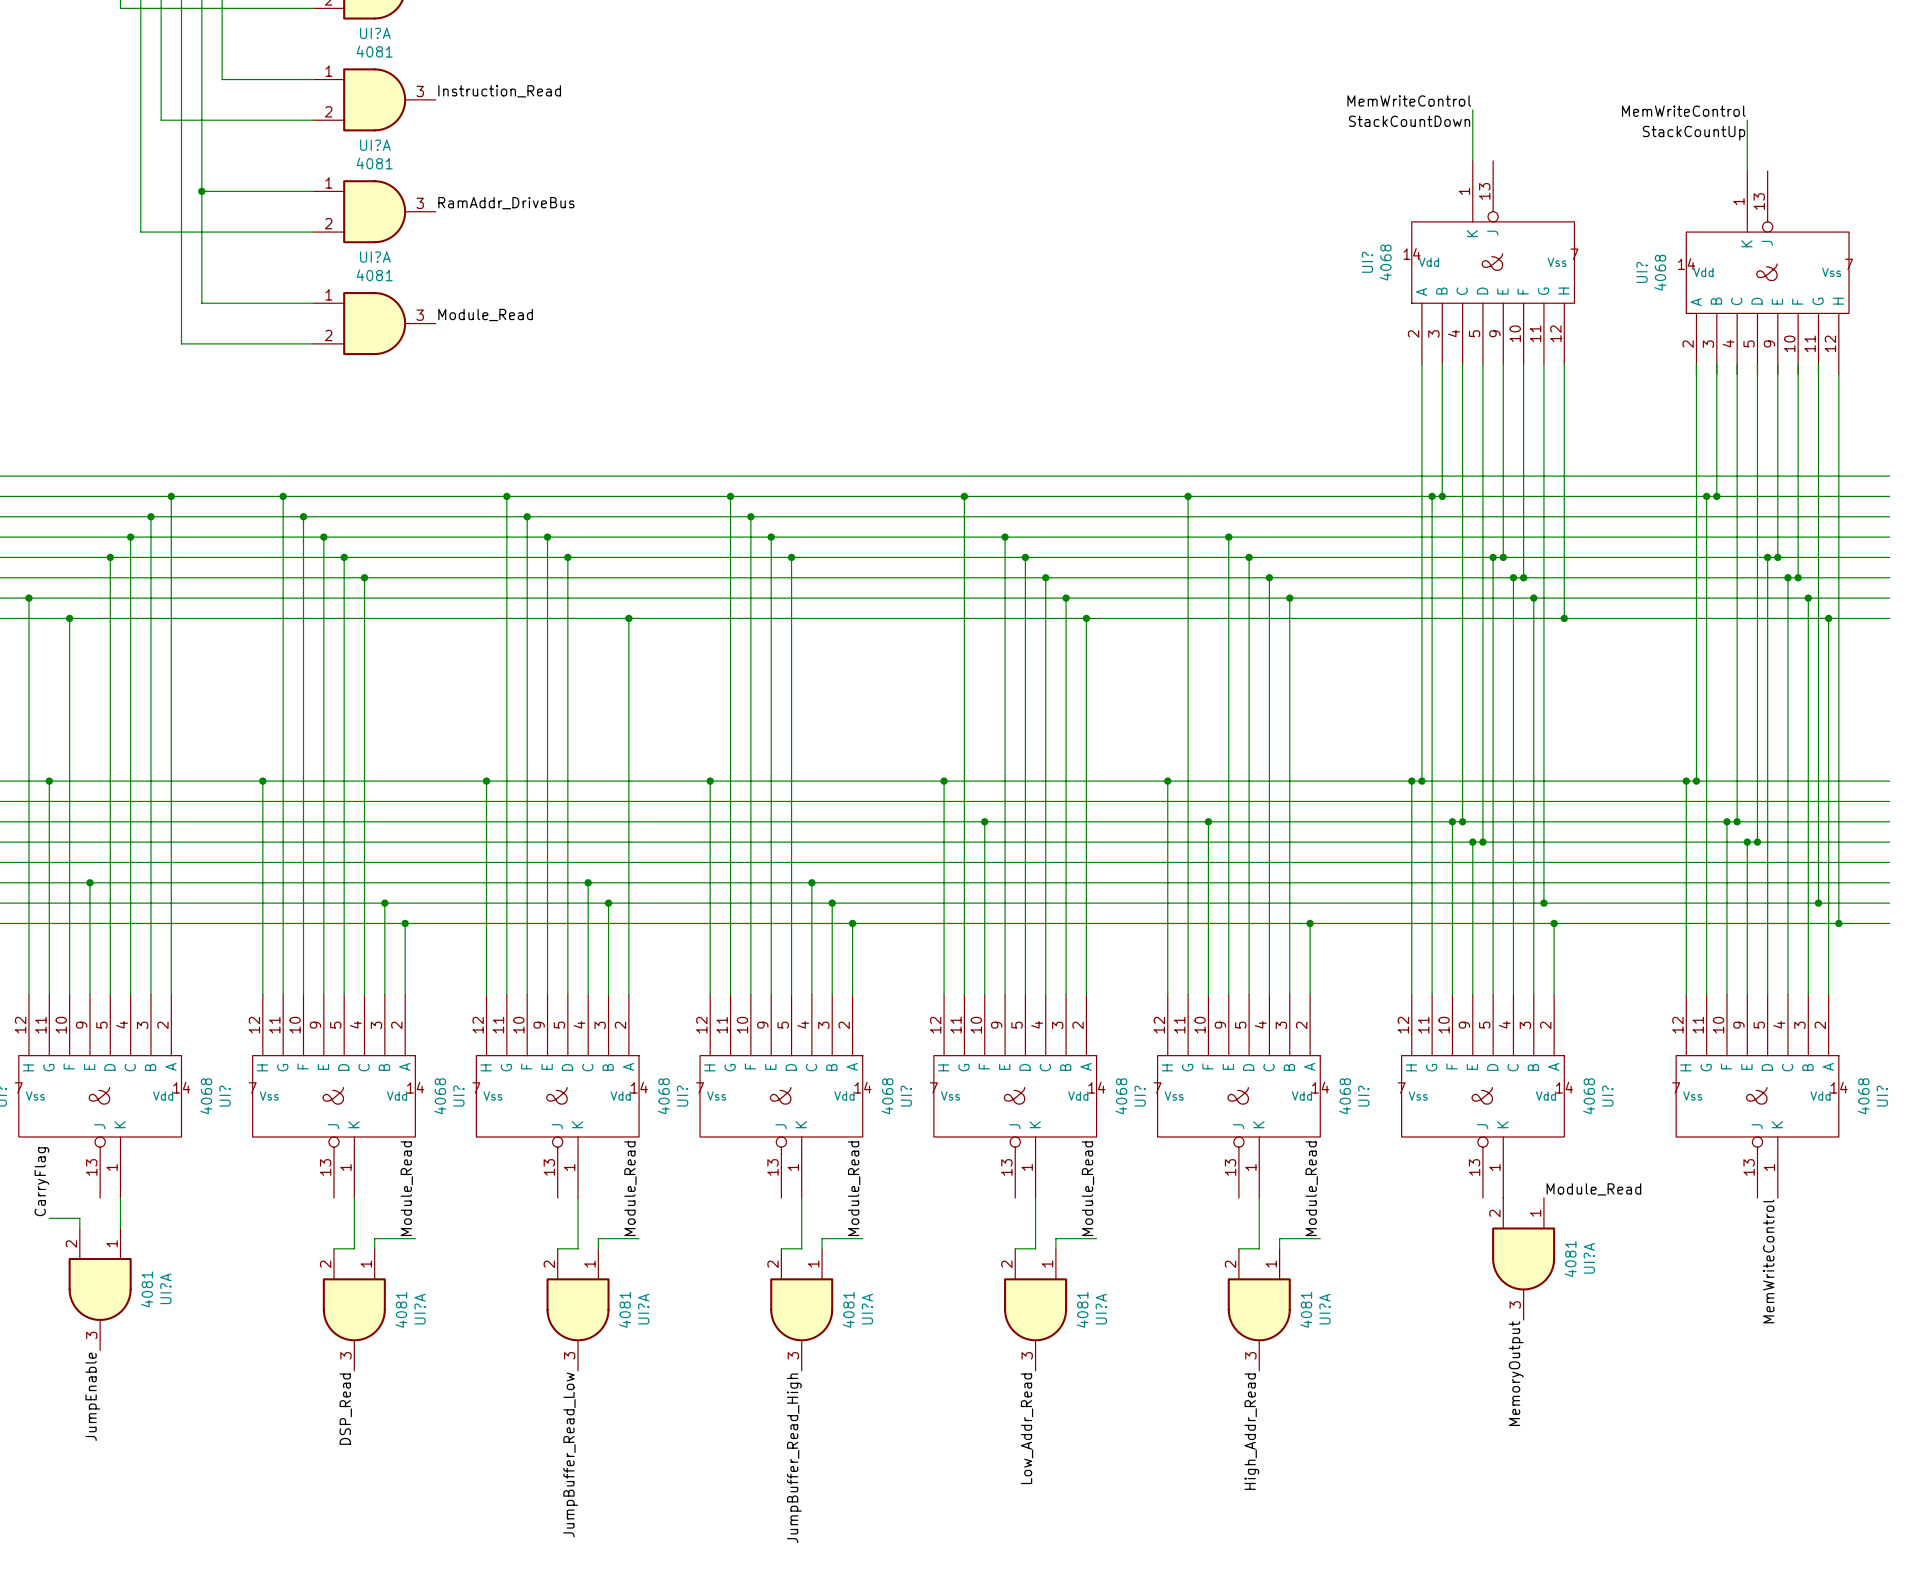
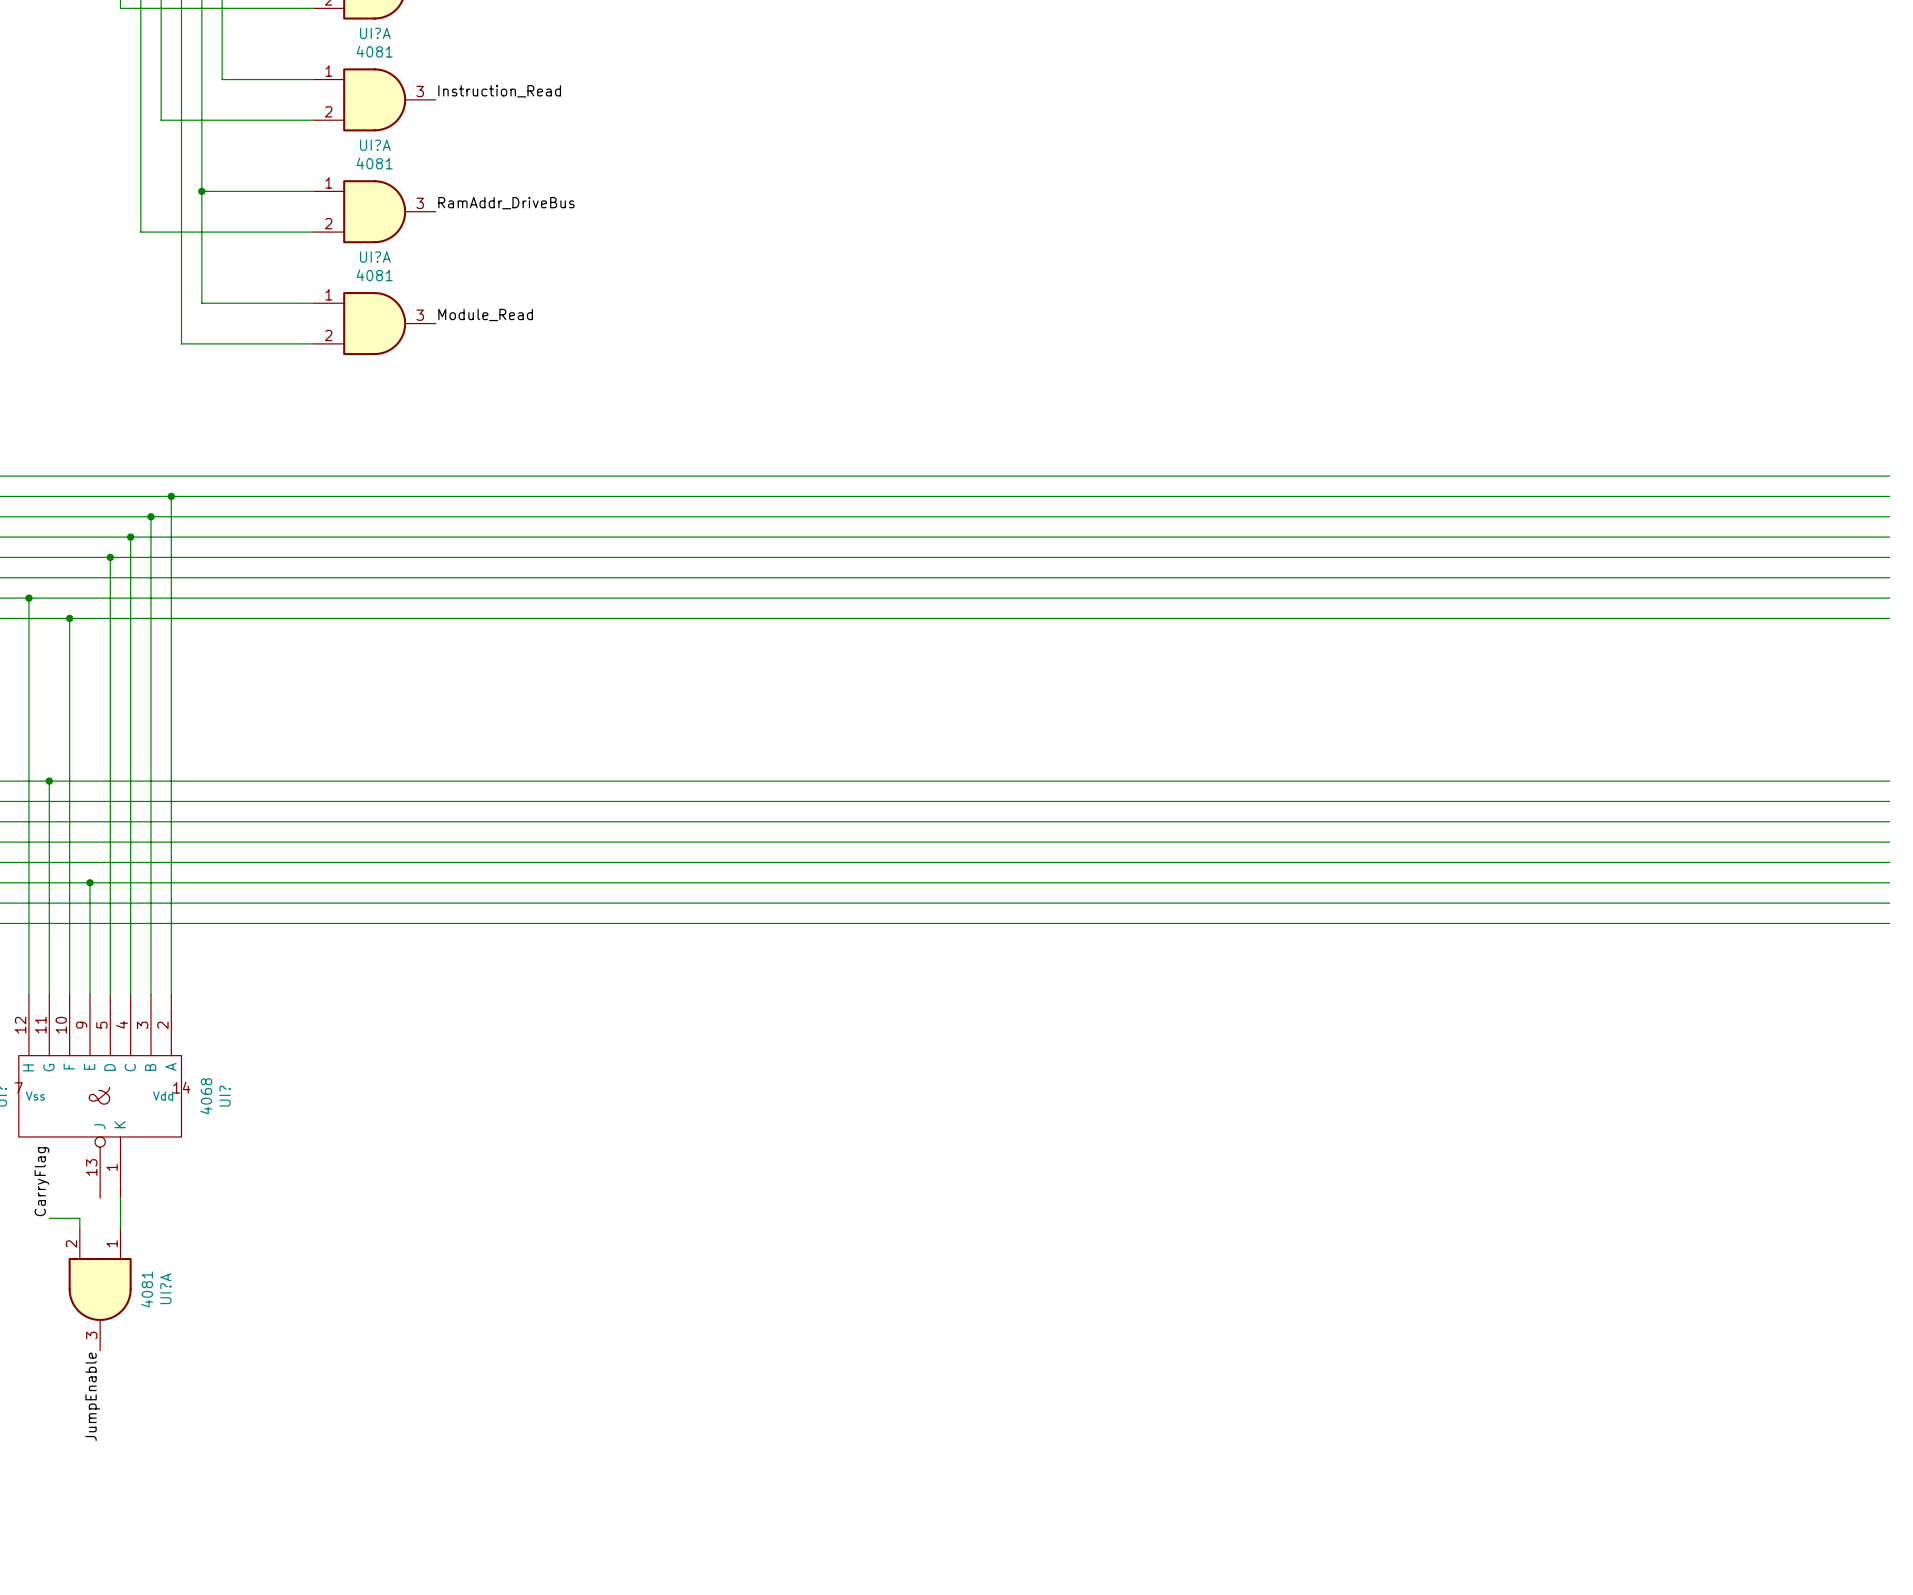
label: MemWriteControl (1409, 100) -> none
wire: (1472, 110) (1472, 160) -> none
label: MemWriteControl (1683, 111) -> none
wire: (1747, 120) (1747, 171) -> none
label: StackCountDown (1409, 121) -> none
label: StackCountUp (1693, 133) -> none
UI?: 4068 (1493, 262) -> none
UI?: 4068 (1767, 272) -> none
wire: (1421, 364) (1421, 781) -> none
wire: (1442, 364) (1442, 496) -> none
wire: (1462, 364) (1462, 821) -> none
wire: (1482, 364) (1482, 842) -> none
wire: (1503, 364) (1503, 557) -> none
wire: (1523, 364) (1523, 577) -> none
wire: (1543, 364) (1543, 903) -> none
wire: (1564, 364) (1564, 618) -> none
wire: (1696, 364) (1696, 781) -> none
wire: (1716, 364) (1716, 496) -> none
wire: (1737, 364) (1737, 821) -> none
wire: (1757, 364) (1757, 842) -> none
wire: (1777, 364) (1777, 557) -> none
wire: (1798, 364) (1798, 577) -> none
wire: (1818, 364) (1818, 903) -> none
wire: (1838, 374) (1838, 923) -> none
wire: (283, 496) (283, 994) -> none
junction: (283, 496) -> none
wire: (506, 496) (506, 994) -> none
junction: (506, 496) -> none
wire: (730, 496) (730, 994) -> none
junction: (730, 496) -> none
wire: (964, 496) (964, 994) -> none
junction: (964, 496) -> none
wire: (1188, 496) (1188, 994) -> none
junction: (1188, 496) -> none
wire: (1432, 496) (1432, 994) -> none
junction: (1432, 496) -> none
junction: (1442, 496) -> none
wire: (1706, 496) (1706, 994) -> none
junction: (1706, 496) -> none
junction: (1716, 496) -> none
wire: (303, 516) (303, 994) -> none
junction: (303, 516) -> none
wire: (527, 516) (527, 994) -> none
junction: (527, 516) -> none
wire: (750, 516) (750, 994) -> none
junction: (750, 516) -> none
wire: (323, 537) (323, 994) -> none
junction: (323, 537) -> none
wire: (547, 537) (547, 994) -> none
junction: (547, 537) -> none
wire: (771, 537) (771, 994) -> none
junction: (771, 537) -> none
wire: (1005, 537) (1005, 994) -> none
junction: (1005, 537) -> none
wire: (1228, 537) (1228, 994) -> none
junction: (1228, 537) -> none
wire: (344, 557) (344, 994) -> none
junction: (344, 557) -> none
wire: (567, 557) (567, 994) -> none
junction: (567, 557) -> none
wire: (791, 557) (791, 994) -> none
junction: (791, 557) -> none
wire: (1025, 557) (1025, 994) -> none
junction: (1025, 557) -> none
wire: (1249, 557) (1249, 994) -> none
junction: (1249, 557) -> none
wire: (1493, 557) (1493, 994) -> none
junction: (1493, 557) -> none
junction: (1503, 557) -> none
wire: (1767, 557) (1767, 994) -> none
junction: (1767, 557) -> none
junction: (1777, 557) -> none
wire: (364, 577) (364, 994) -> none
junction: (364, 577) -> none
wire: (1045, 577) (1045, 994) -> none
junction: (1045, 577) -> none
wire: (1269, 577) (1269, 994) -> none
junction: (1269, 577) -> none
wire: (1513, 577) (1513, 994) -> none
junction: (1513, 577) -> none
junction: (1523, 577) -> none
wire: (1787, 577) (1787, 994) -> none
junction: (1787, 577) -> none
junction: (1798, 577) -> none
wire: (1066, 598) (1066, 994) -> none
junction: (1066, 598) -> none
wire: (1289, 598) (1289, 994) -> none
junction: (1289, 598) -> none
wire: (1533, 598) (1533, 994) -> none
junction: (1533, 598) -> none
wire: (1808, 598) (1808, 994) -> none
junction: (1808, 598) -> none
wire: (628, 618) (628, 994) -> none
junction: (628, 618) -> none
wire: (1086, 618) (1086, 994) -> none
junction: (1086, 618) -> none
junction: (1564, 618) -> none
wire: (1828, 618) (1828, 994) -> none
junction: (1828, 618) -> none
wire: (262, 781) (262, 994) -> none
junction: (262, 781) -> none
wire: (486, 781) (486, 994) -> none
junction: (486, 781) -> none
wire: (710, 781) (710, 994) -> none
junction: (710, 781) -> none
wire: (944, 781) (944, 994) -> none
junction: (944, 781) -> none
wire: (1167, 781) (1167, 994) -> none
junction: (1167, 781) -> none
wire: (1411, 781) (1411, 994) -> none
junction: (1411, 781) -> none
junction: (1421, 781) -> none
wire: (1686, 781) (1686, 994) -> none
junction: (1686, 781) -> none
junction: (1696, 781) -> none
wire: (984, 821) (984, 994) -> none
junction: (984, 821) -> none
wire: (1208, 821) (1208, 994) -> none
junction: (1208, 821) -> none
wire: (1452, 821) (1452, 994) -> none
junction: (1452, 821) -> none
junction: (1462, 821) -> none
wire: (1726, 821) (1726, 994) -> none
junction: (1726, 821) -> none
junction: (1737, 821) -> none
wire: (1472, 842) (1472, 994) -> none
junction: (1472, 842) -> none
junction: (1482, 842) -> none
wire: (1747, 842) (1747, 994) -> none
junction: (1747, 842) -> none
junction: (1757, 842) -> none
wire: (588, 882) (588, 994) -> none
junction: (588, 882) -> none
wire: (811, 882) (811, 994) -> none
junction: (811, 882) -> none
wire: (384, 903) (384, 994) -> none
junction: (384, 903) -> none
wire: (608, 903) (608, 994) -> none
junction: (608, 903) -> none
wire: (832, 903) (832, 994) -> none
junction: (832, 903) -> none
junction: (1543, 903) -> none
junction: (1818, 903) -> none
wire: (405, 923) (405, 994) -> none
junction: (405, 923) -> none
wire: (852, 923) (852, 994) -> none
junction: (852, 923) -> none
wire: (1310, 923) (1310, 994) -> none
junction: (1310, 923) -> none
wire: (1554, 923) (1554, 994) -> none
junction: (1554, 923) -> none
junction: (1838, 923) -> none
UI?: 4068 (334, 1096) -> none
UI?: 4068 (557, 1096) -> none
UI?: 4068 (781, 1096) -> none
UI?: 4068 (1015, 1096) -> none
UI?: 4068 (1238, 1096) -> none
UI?: 4068 (1482, 1096) -> none
UI?: 4068 (1757, 1096) -> none
label: Module_Read (406, 1188) -> none
label: Module_Read (630, 1188) -> none
label: Module_Read (854, 1188) -> none
label: Module_Read (1087, 1188) -> none
label: Module_Read (1311, 1188) -> none
label: Module_Read (1593, 1189) -> none
wire: (354, 1197) (354, 1248) (334, 1248) -> none
wire: (578, 1197) (578, 1248) (557, 1248) -> none
wire: (801, 1197) (801, 1248) (781, 1248) -> none
wire: (1035, 1197) (1035, 1248) (1015, 1248) -> none
wire: (1259, 1197) (1259, 1248) (1238, 1248) -> none
wire: (415, 1238) (374, 1238) (374, 1248) -> none
wire: (639, 1238) (598, 1238) (598, 1248) -> none
wire: (862, 1238) (822, 1238) (822, 1248) -> none
wire: (1096, 1238) (1055, 1238) (1055, 1248) -> none
wire: (1320, 1238) (1279, 1238) (1279, 1248) -> none
UI?A: 4081 (1523, 1258) -> none
label: MemWriteControl (1768, 1261) -> none
UI?A: 4081 (354, 1309) -> none
UI?A: 4081 (578, 1309) -> none
UI?A: 4081 (801, 1309) -> none
UI?A: 4081 (1035, 1309) -> none
UI?A: 4081 (1259, 1309) -> none
label: MemoryOutput (1516, 1373) -> none
label: DSP_Read (345, 1409) -> none
label: Low_Addr_Read (1026, 1428) -> none
label: High_Addr_Read (1251, 1431) -> none
label: JumpBuffer_Read_Low (570, 1454) -> none
label: JumpBuffer_Read_High (794, 1458) -> none

